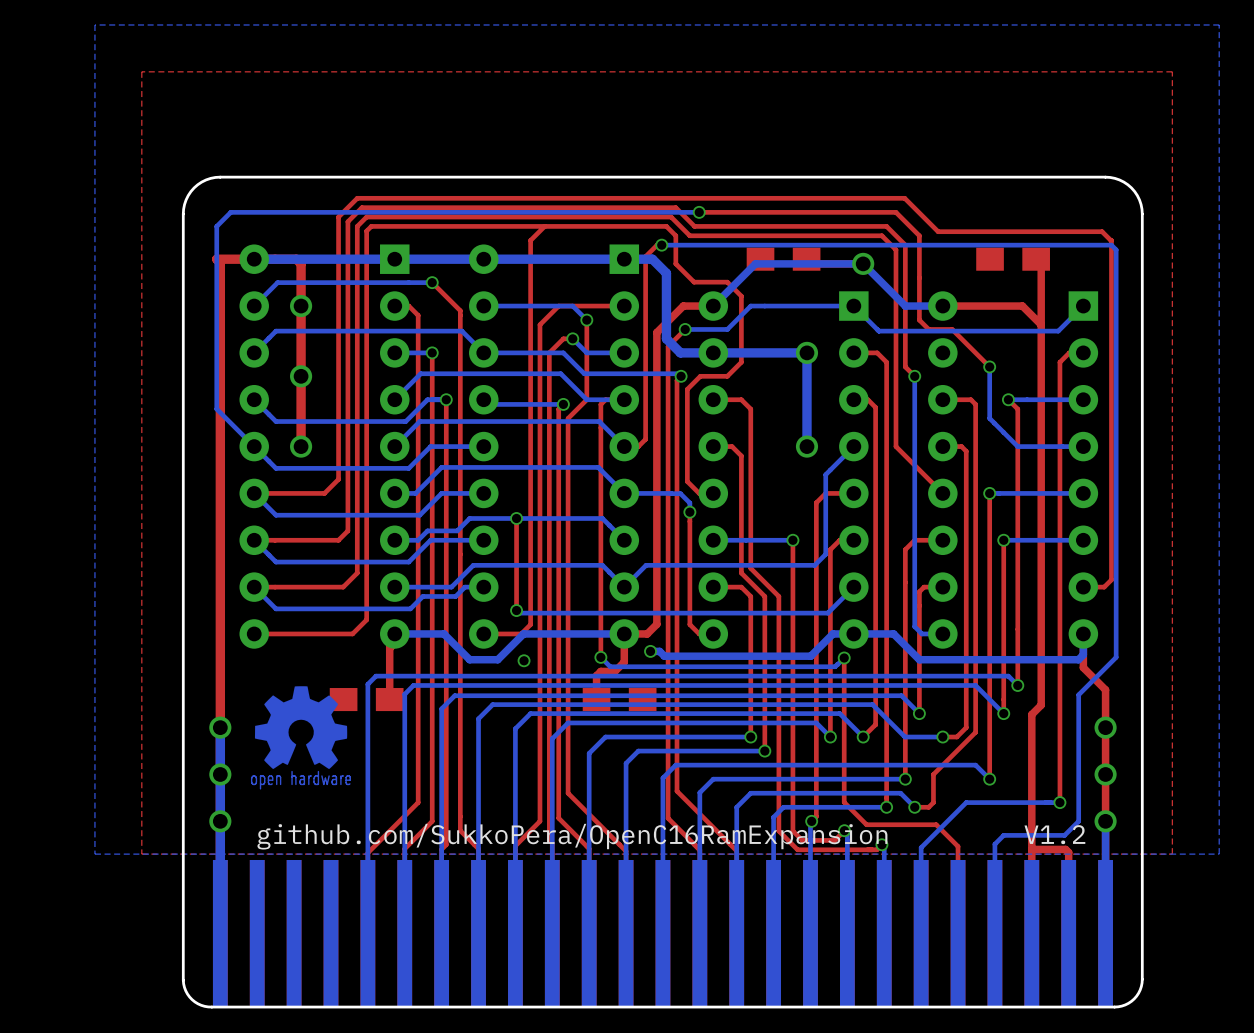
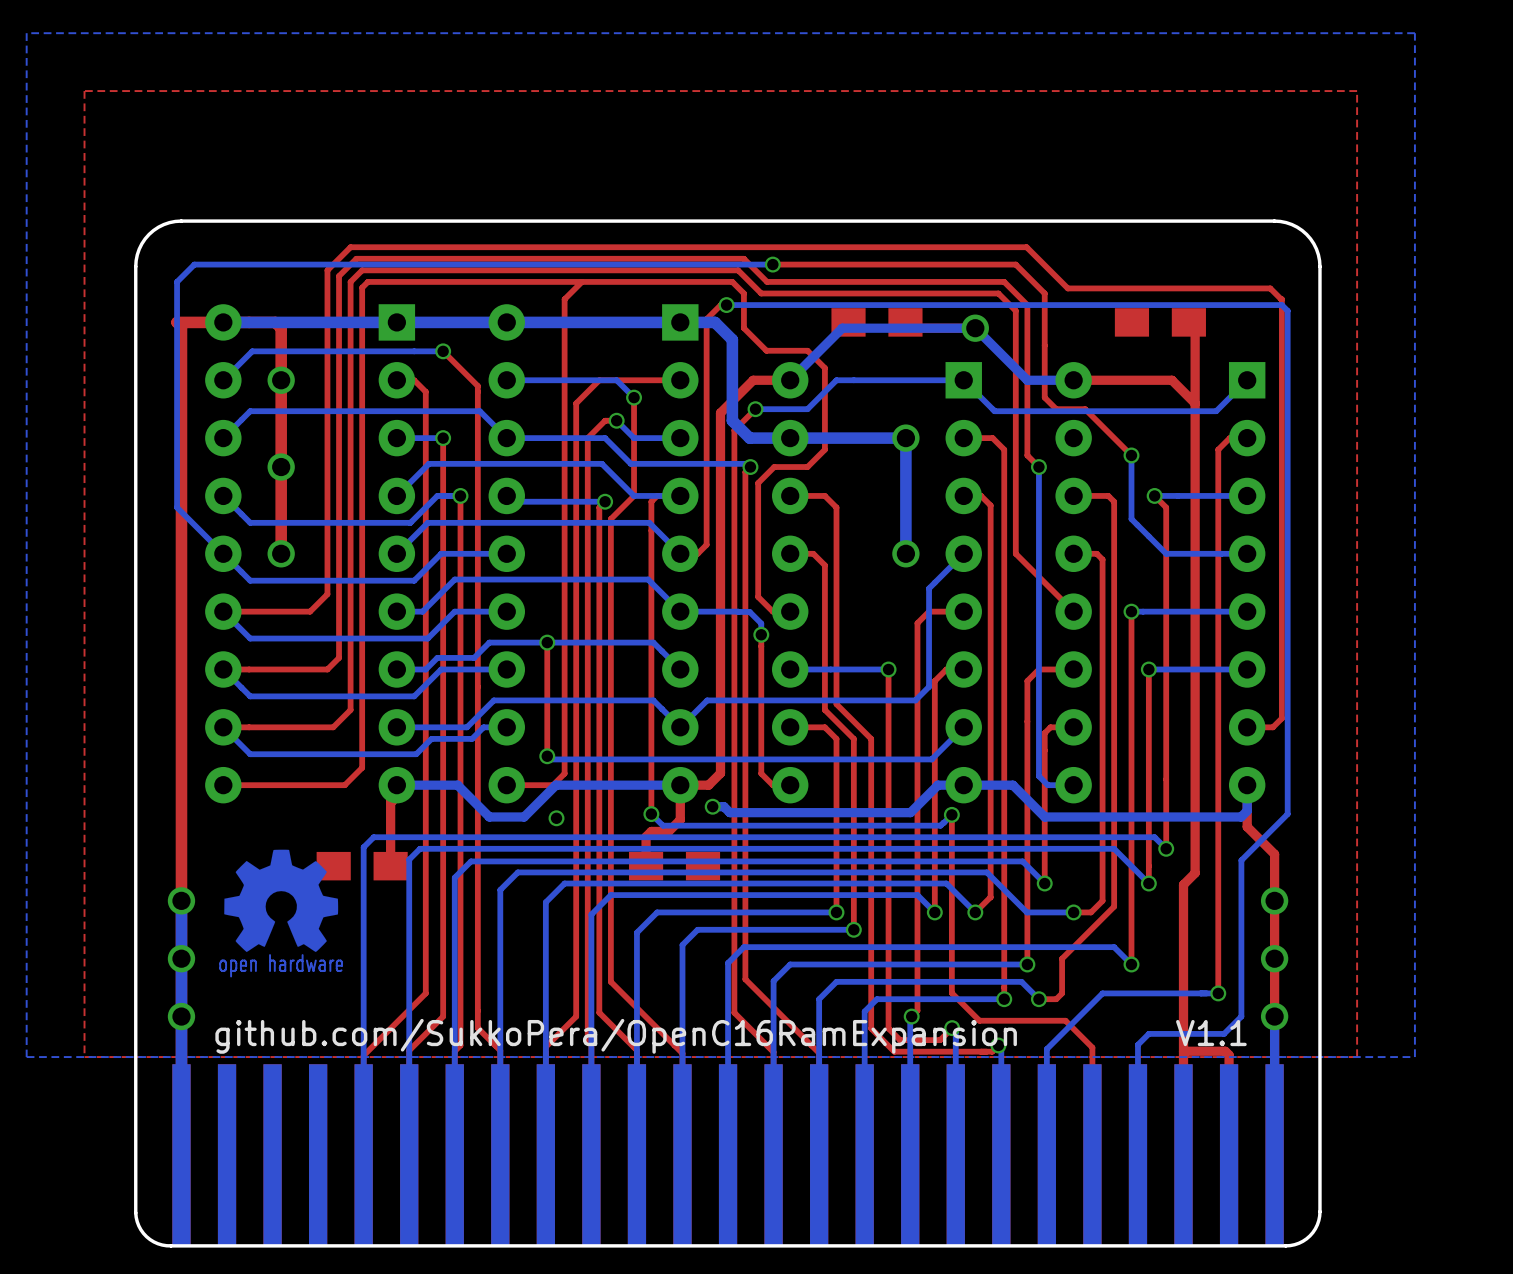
text: V1.2 (1054, 834) -> V1.1 (1211, 1033)

